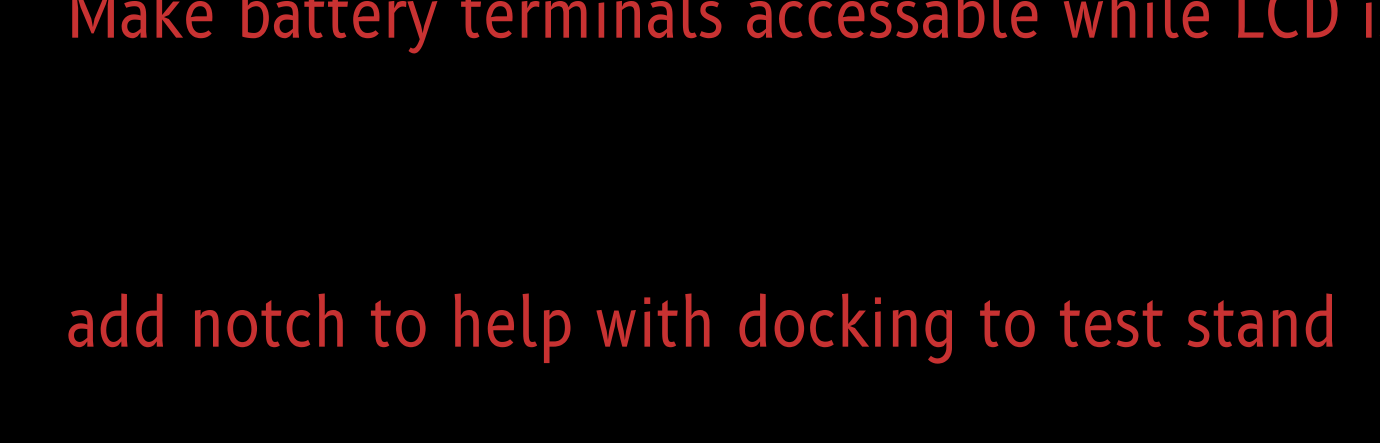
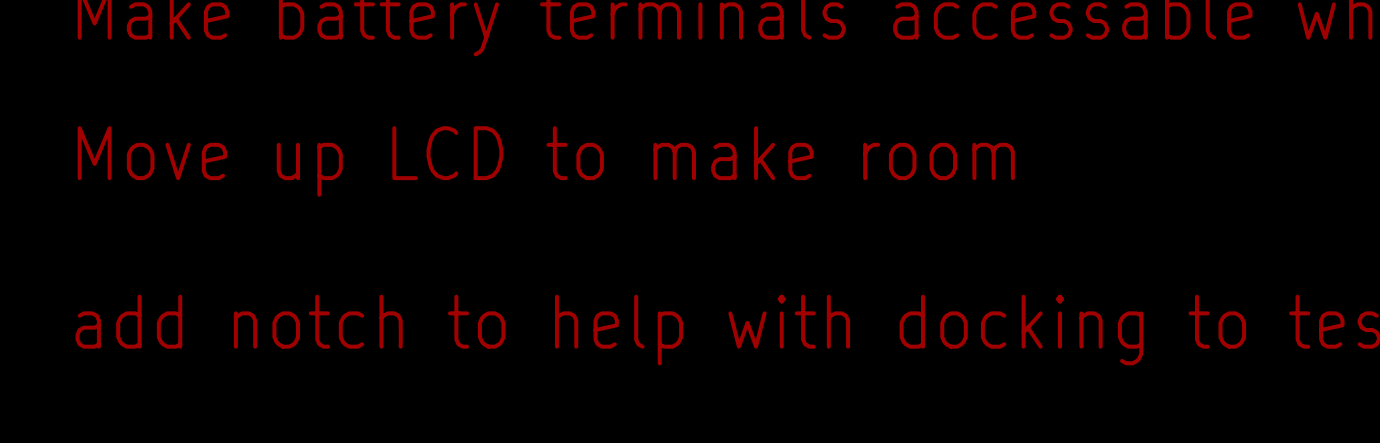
text: none -> Move up LCD to make room (546, 161)

